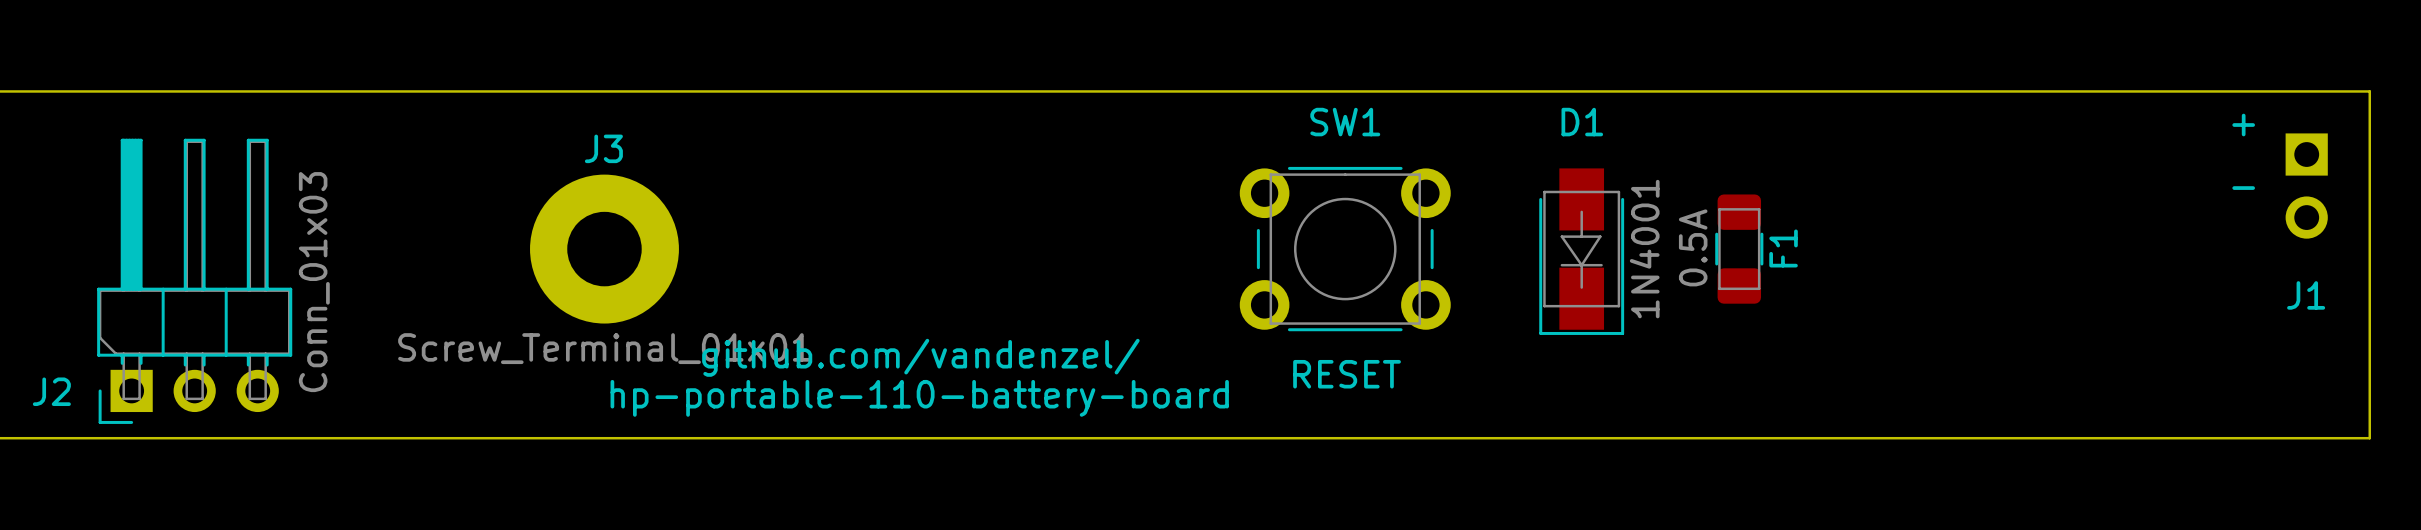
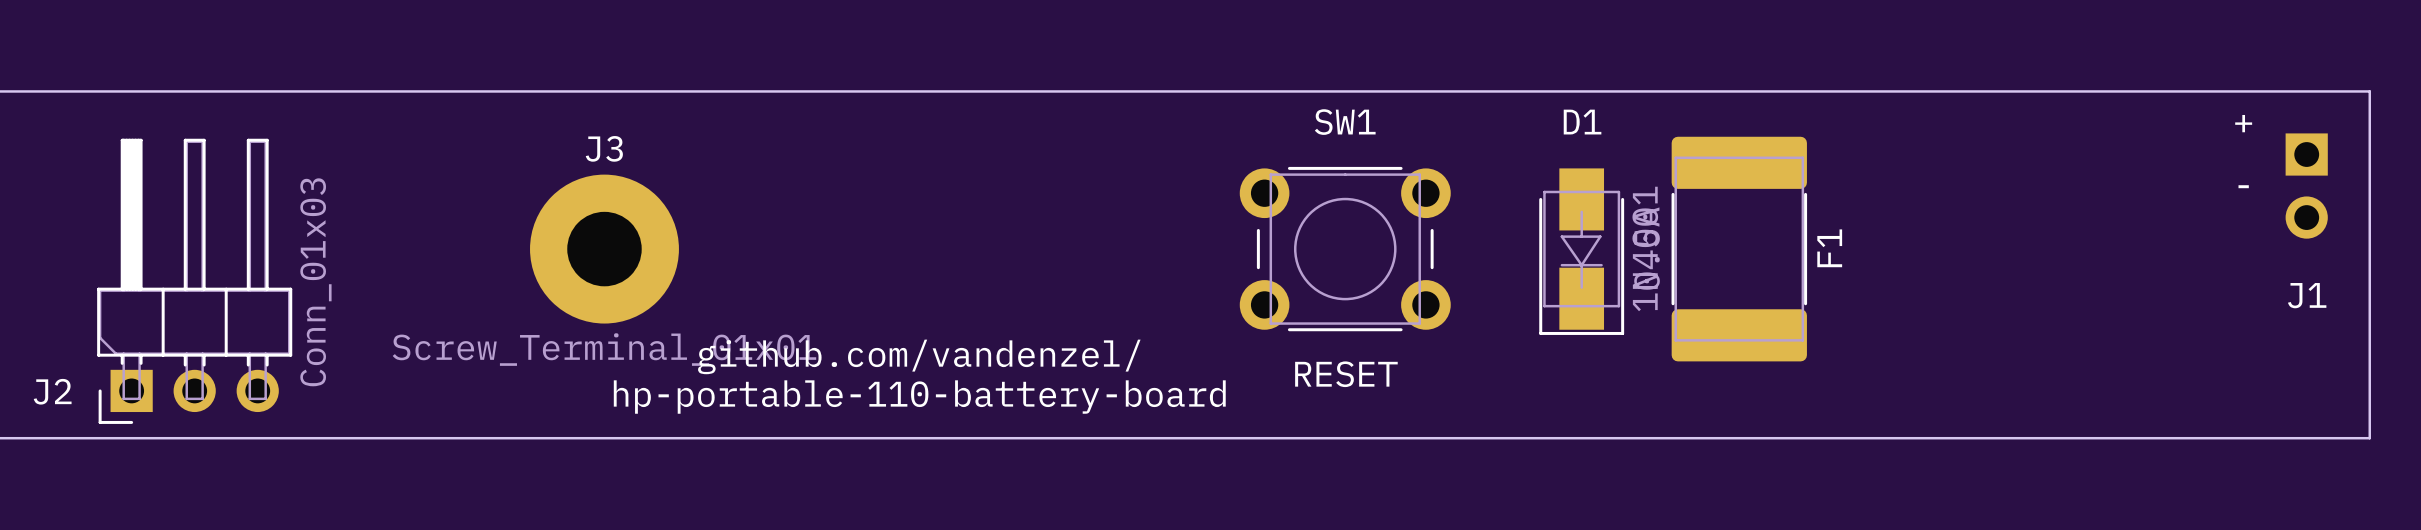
F1 footprint: [1715, 194, 1764, 304] -> [1671, 136, 1808, 362]

